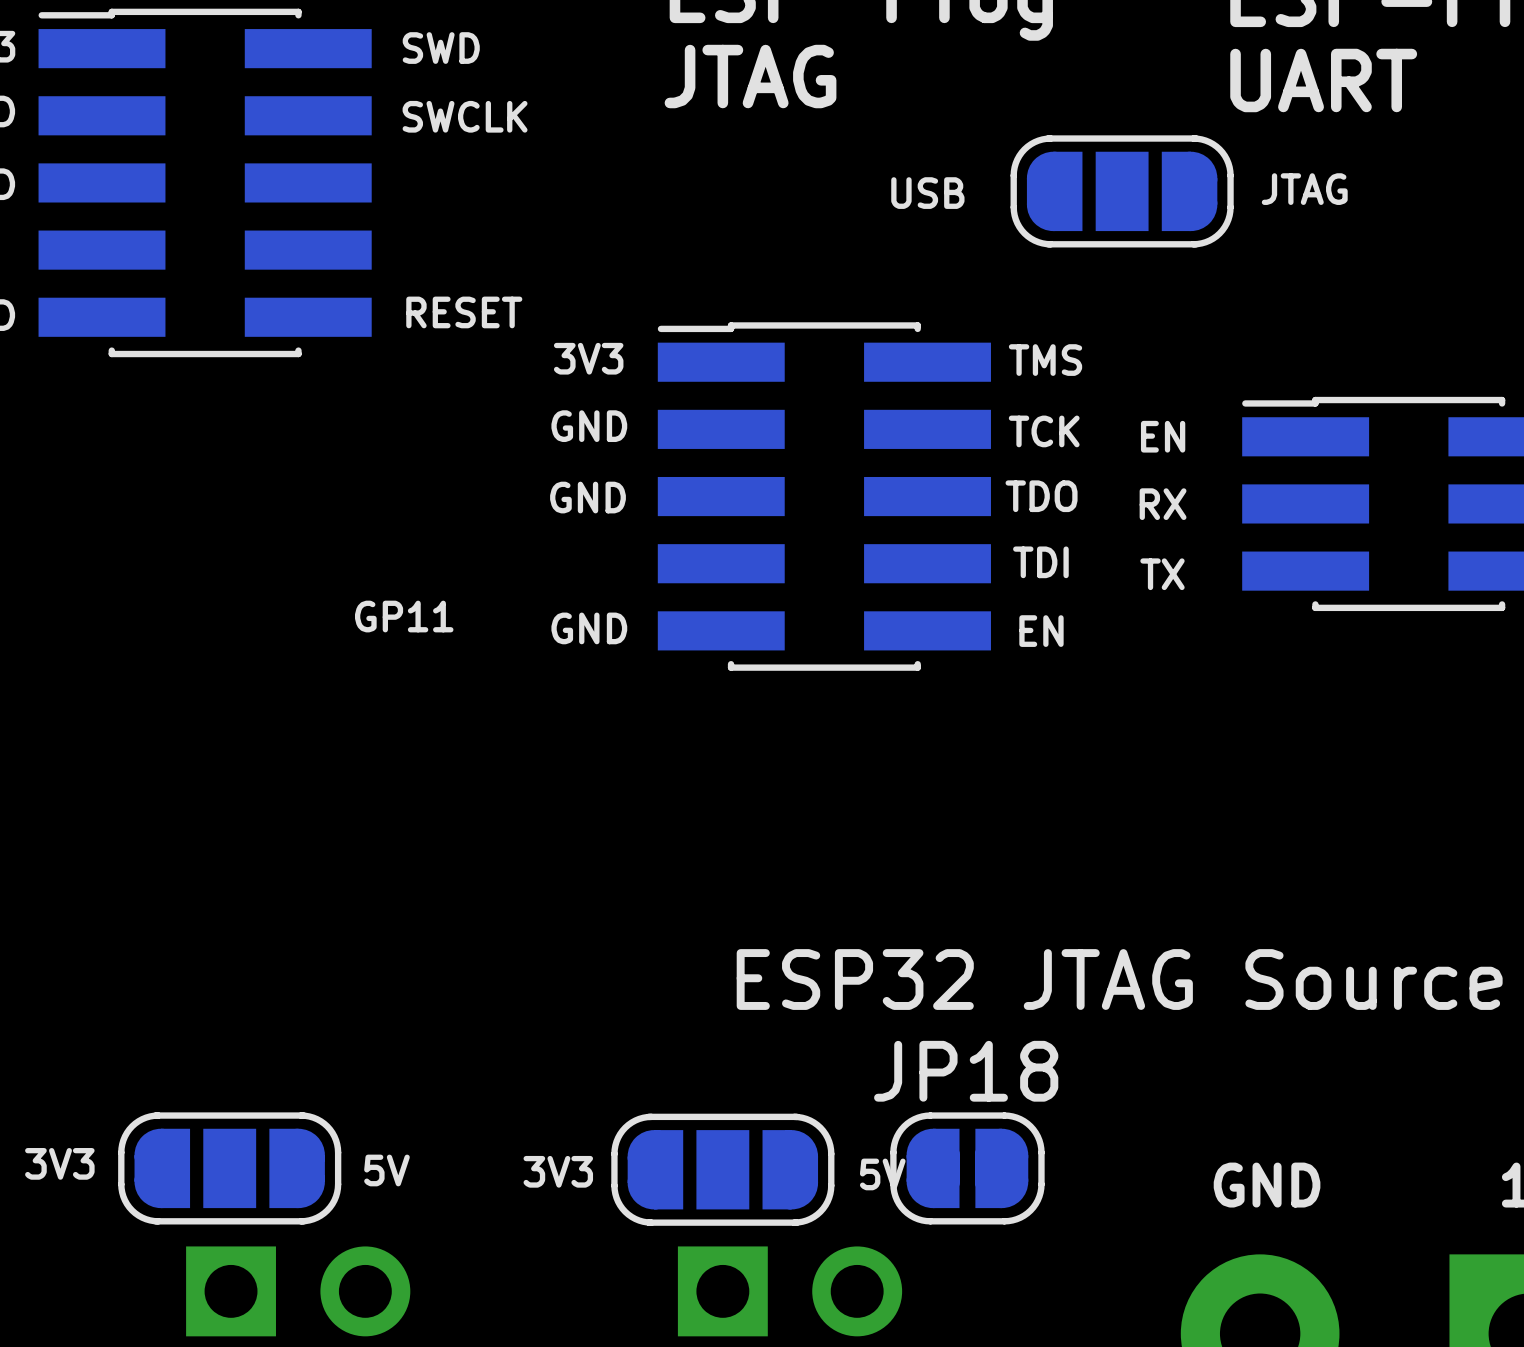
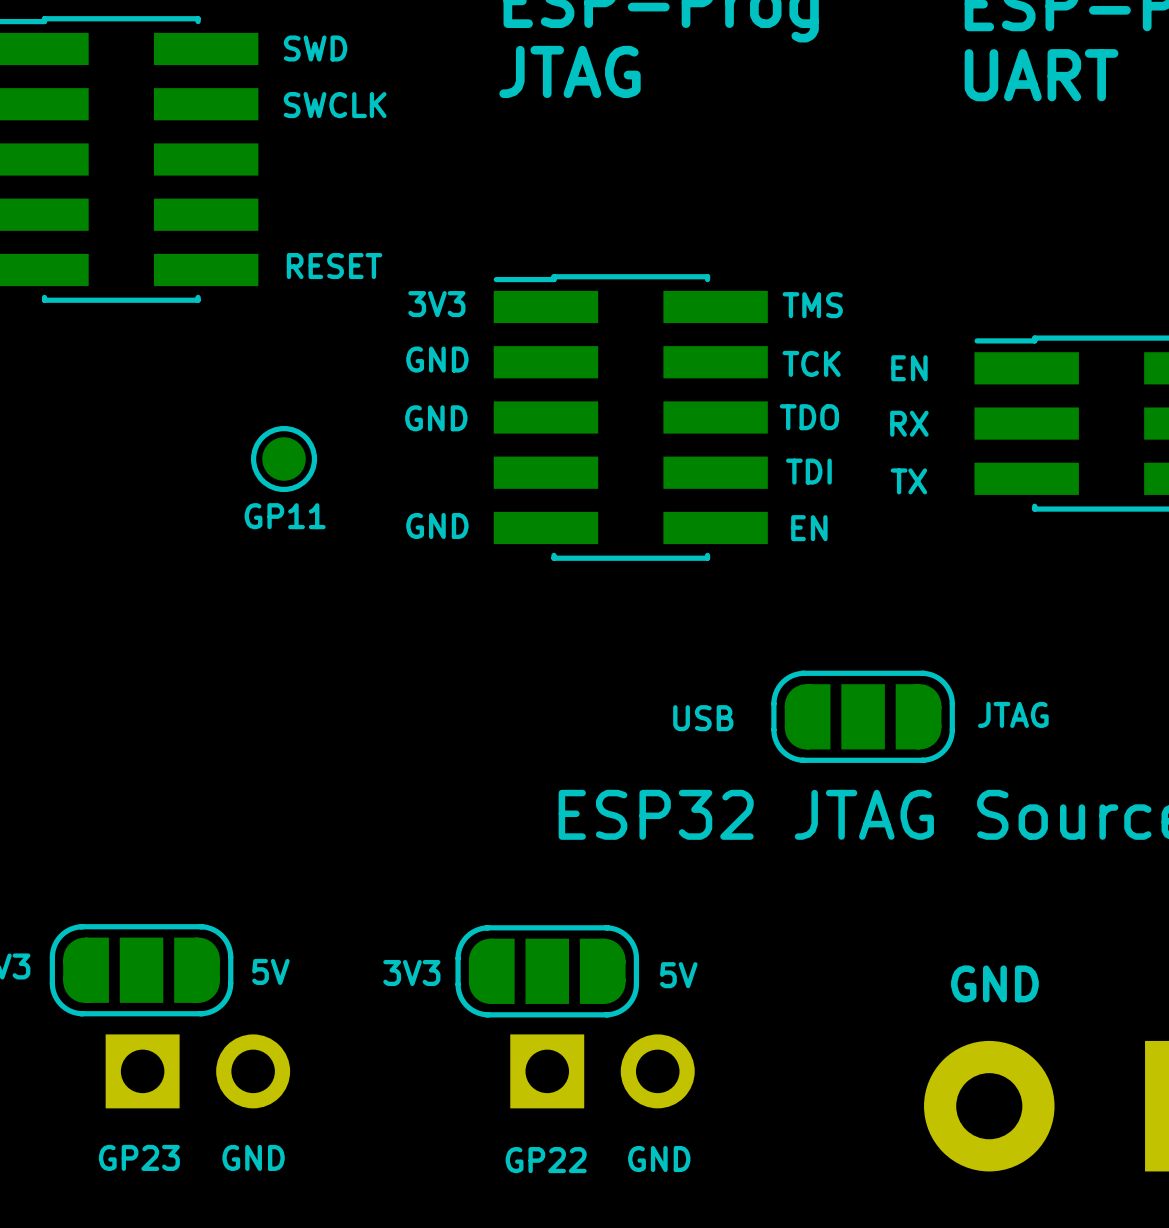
part position: (1122, 191) -> (863, 716)
part: none -> (284, 459)
JP18: (967, 1168) -> none

